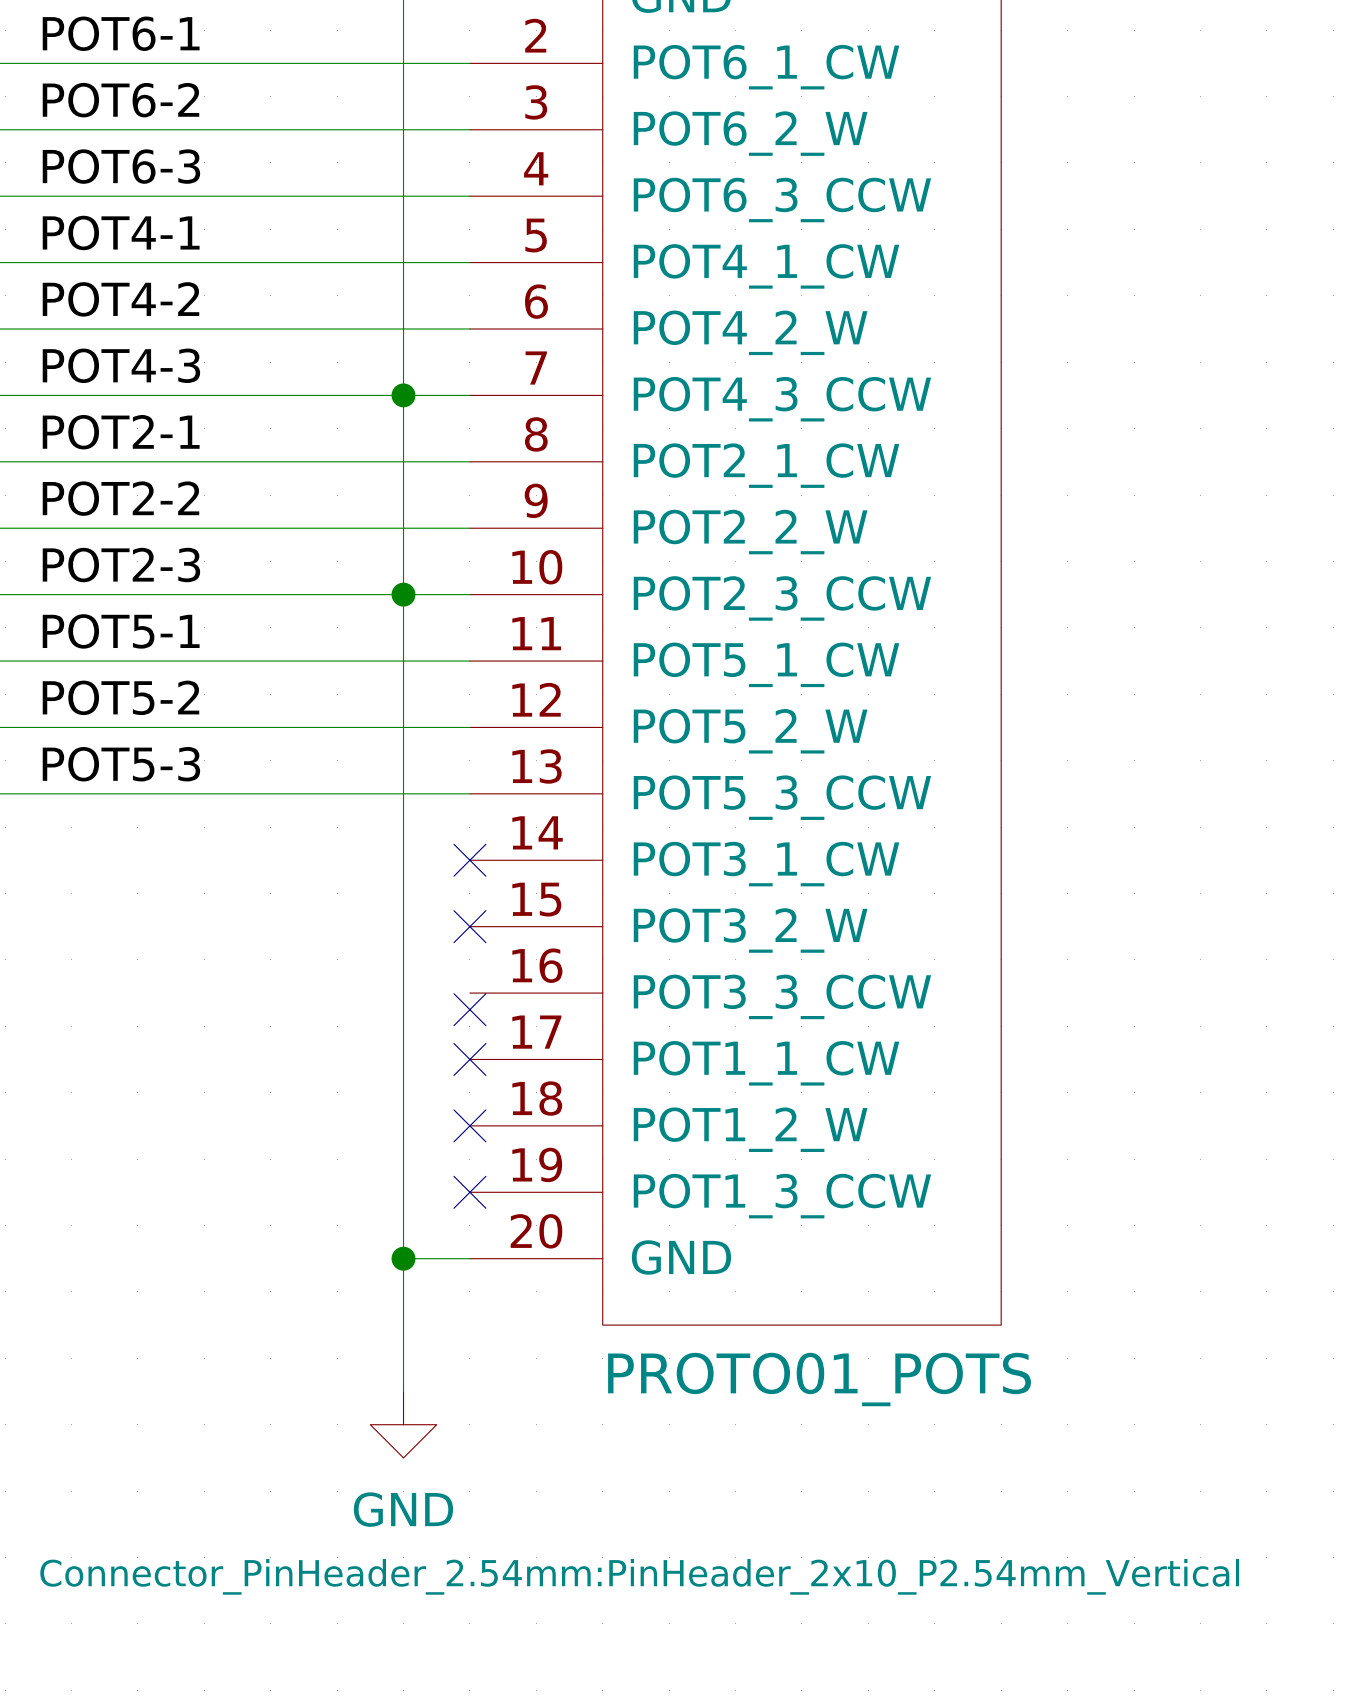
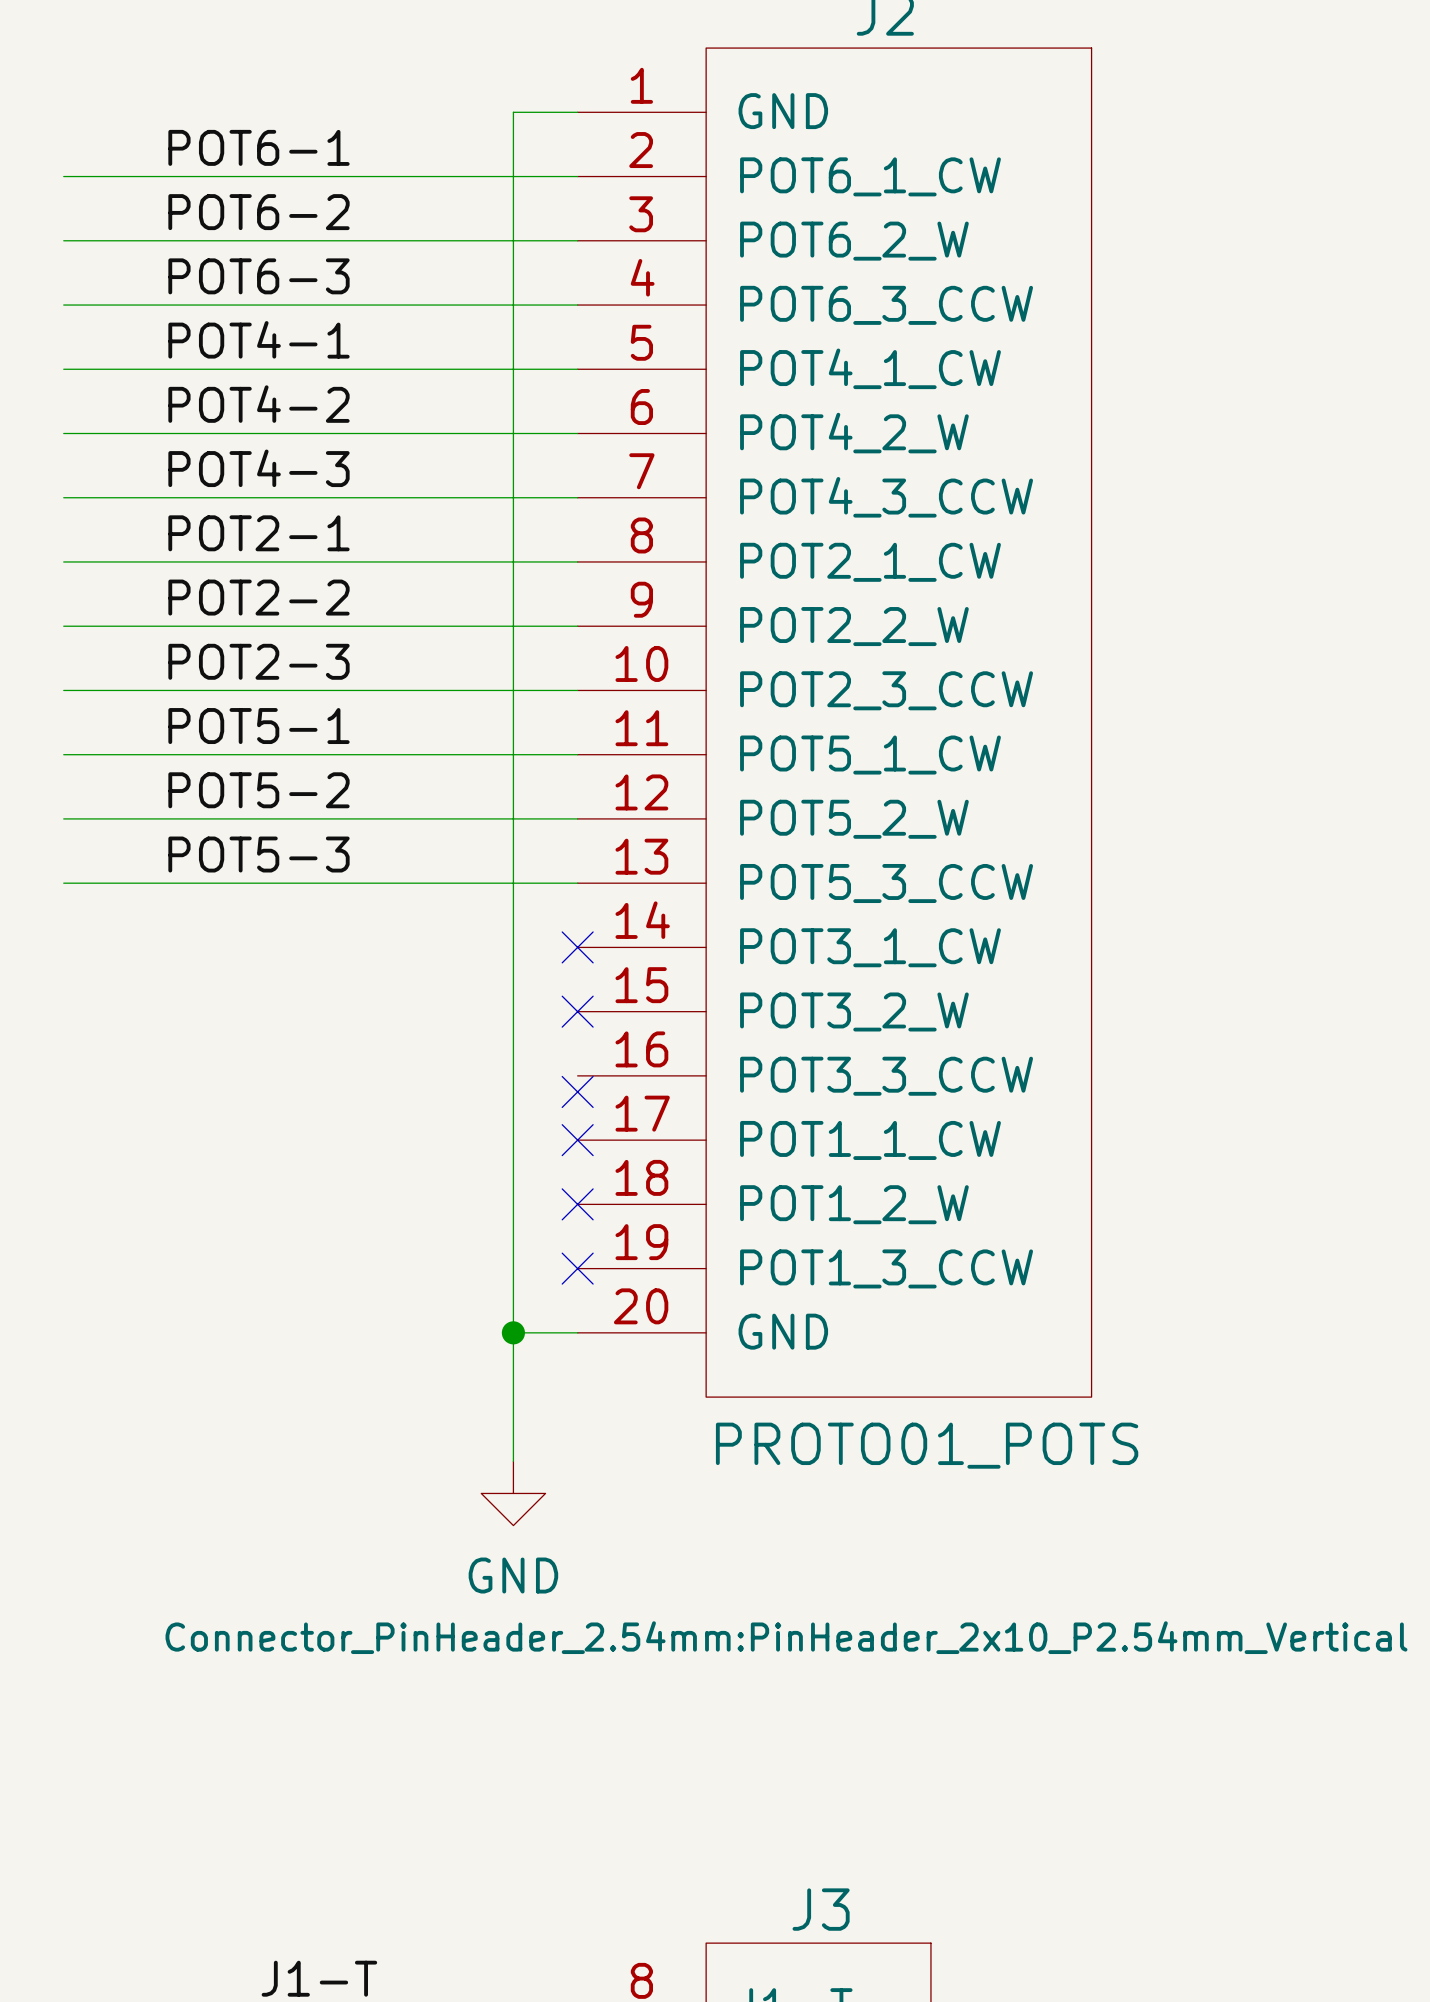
junction: (403, 395) -> none
junction: (403, 594) -> none

